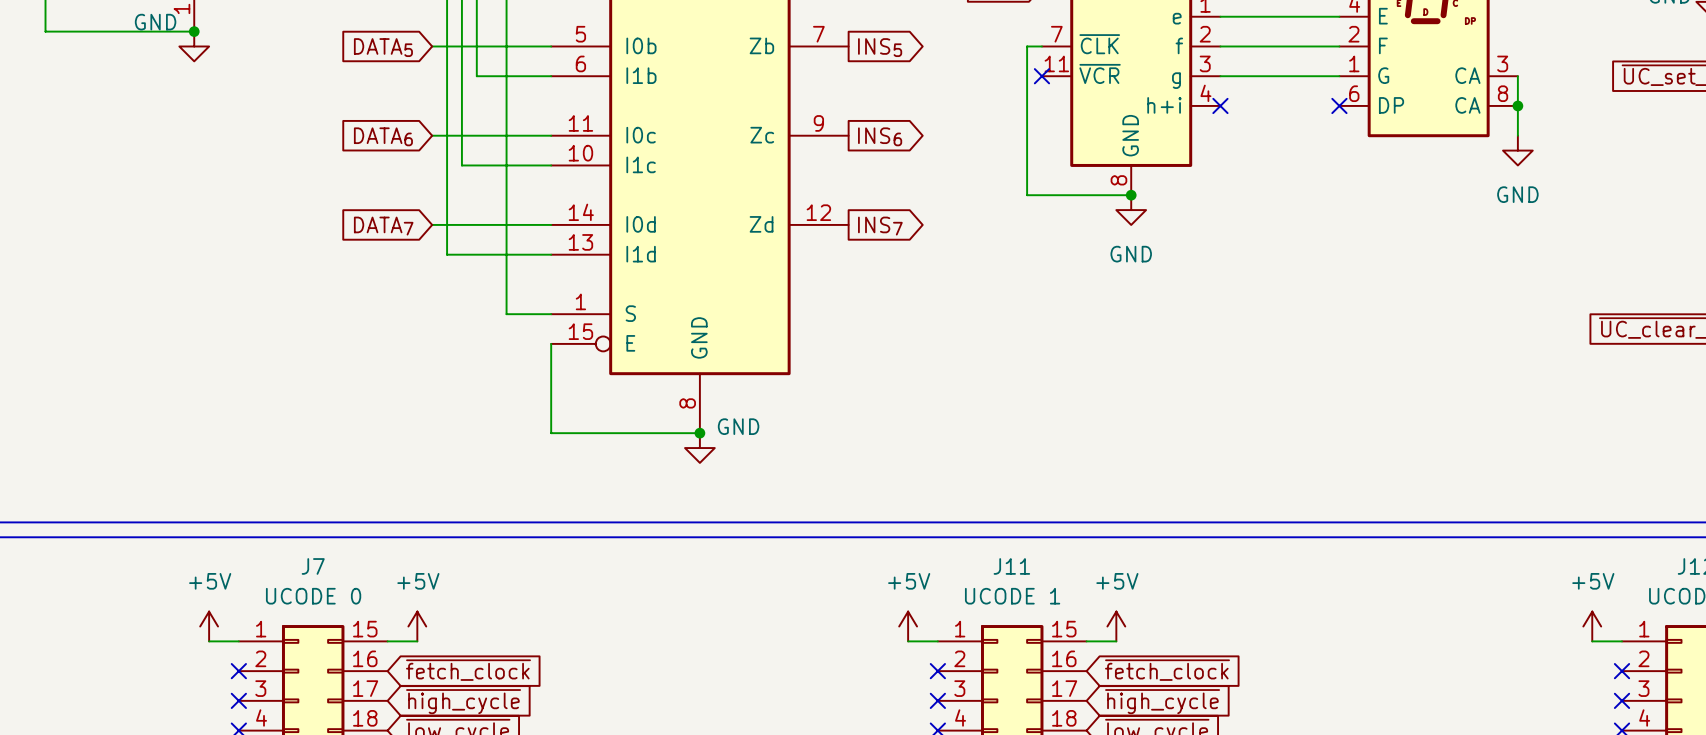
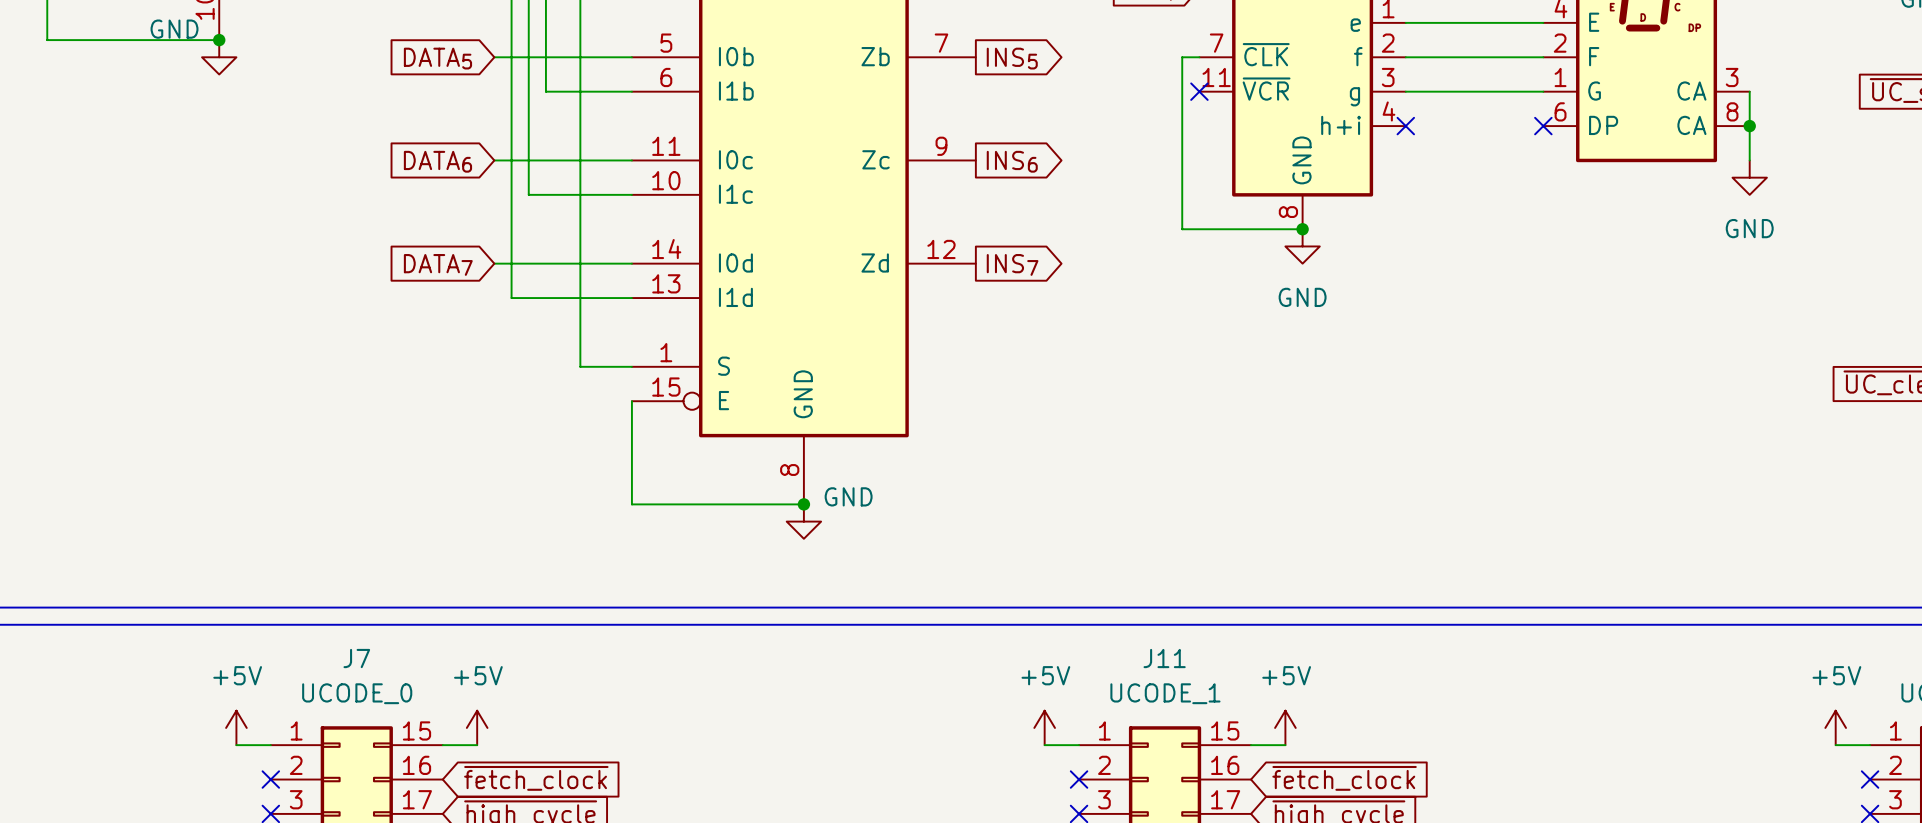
J7 value: UCODE 0 (313, 596) -> UCODE_0 (357, 693)
J11 value: UCODE 1 (1012, 596) -> UCODE_1 (1165, 693)

